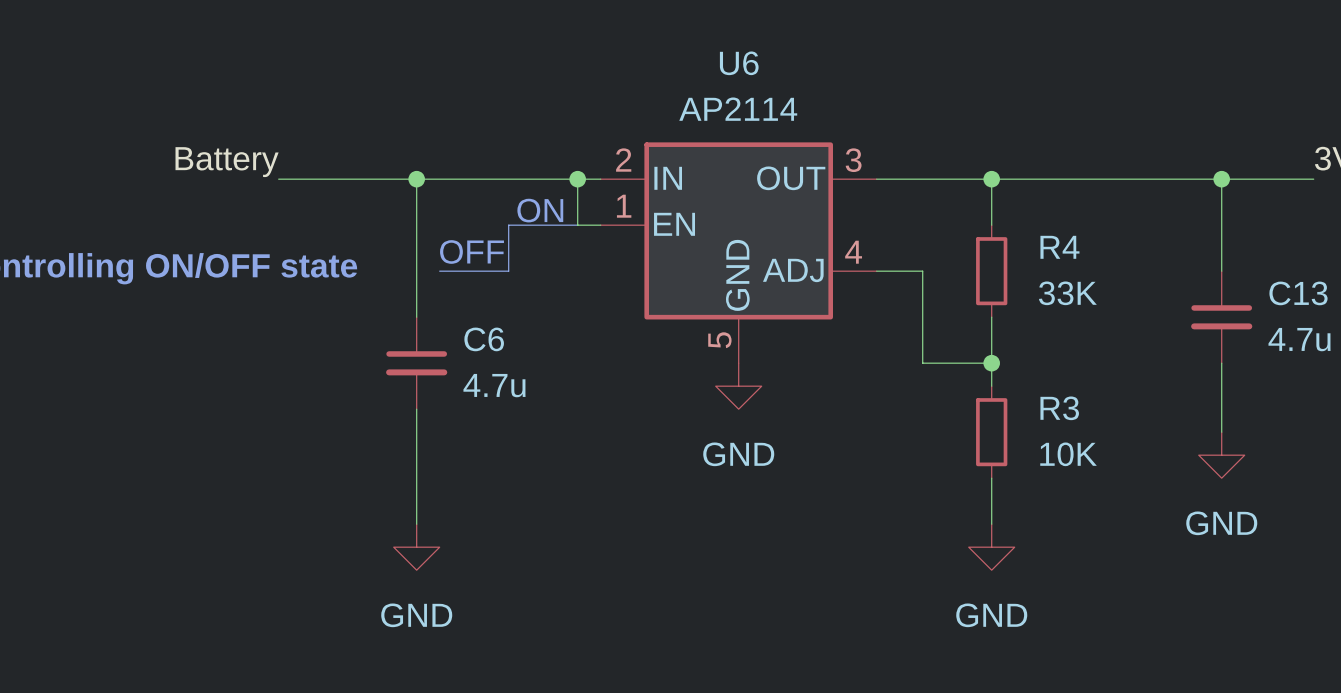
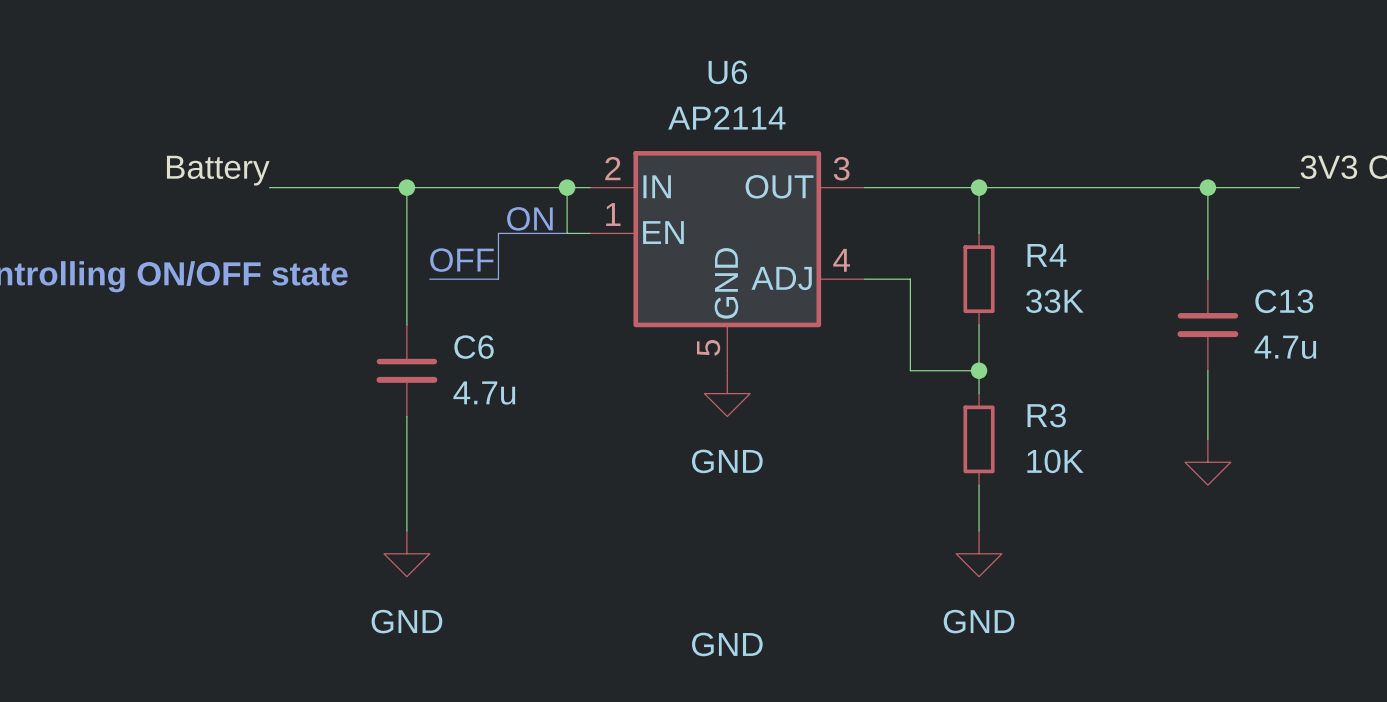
power symbol text position: GND (1221, 523) -> GND (727, 644)

